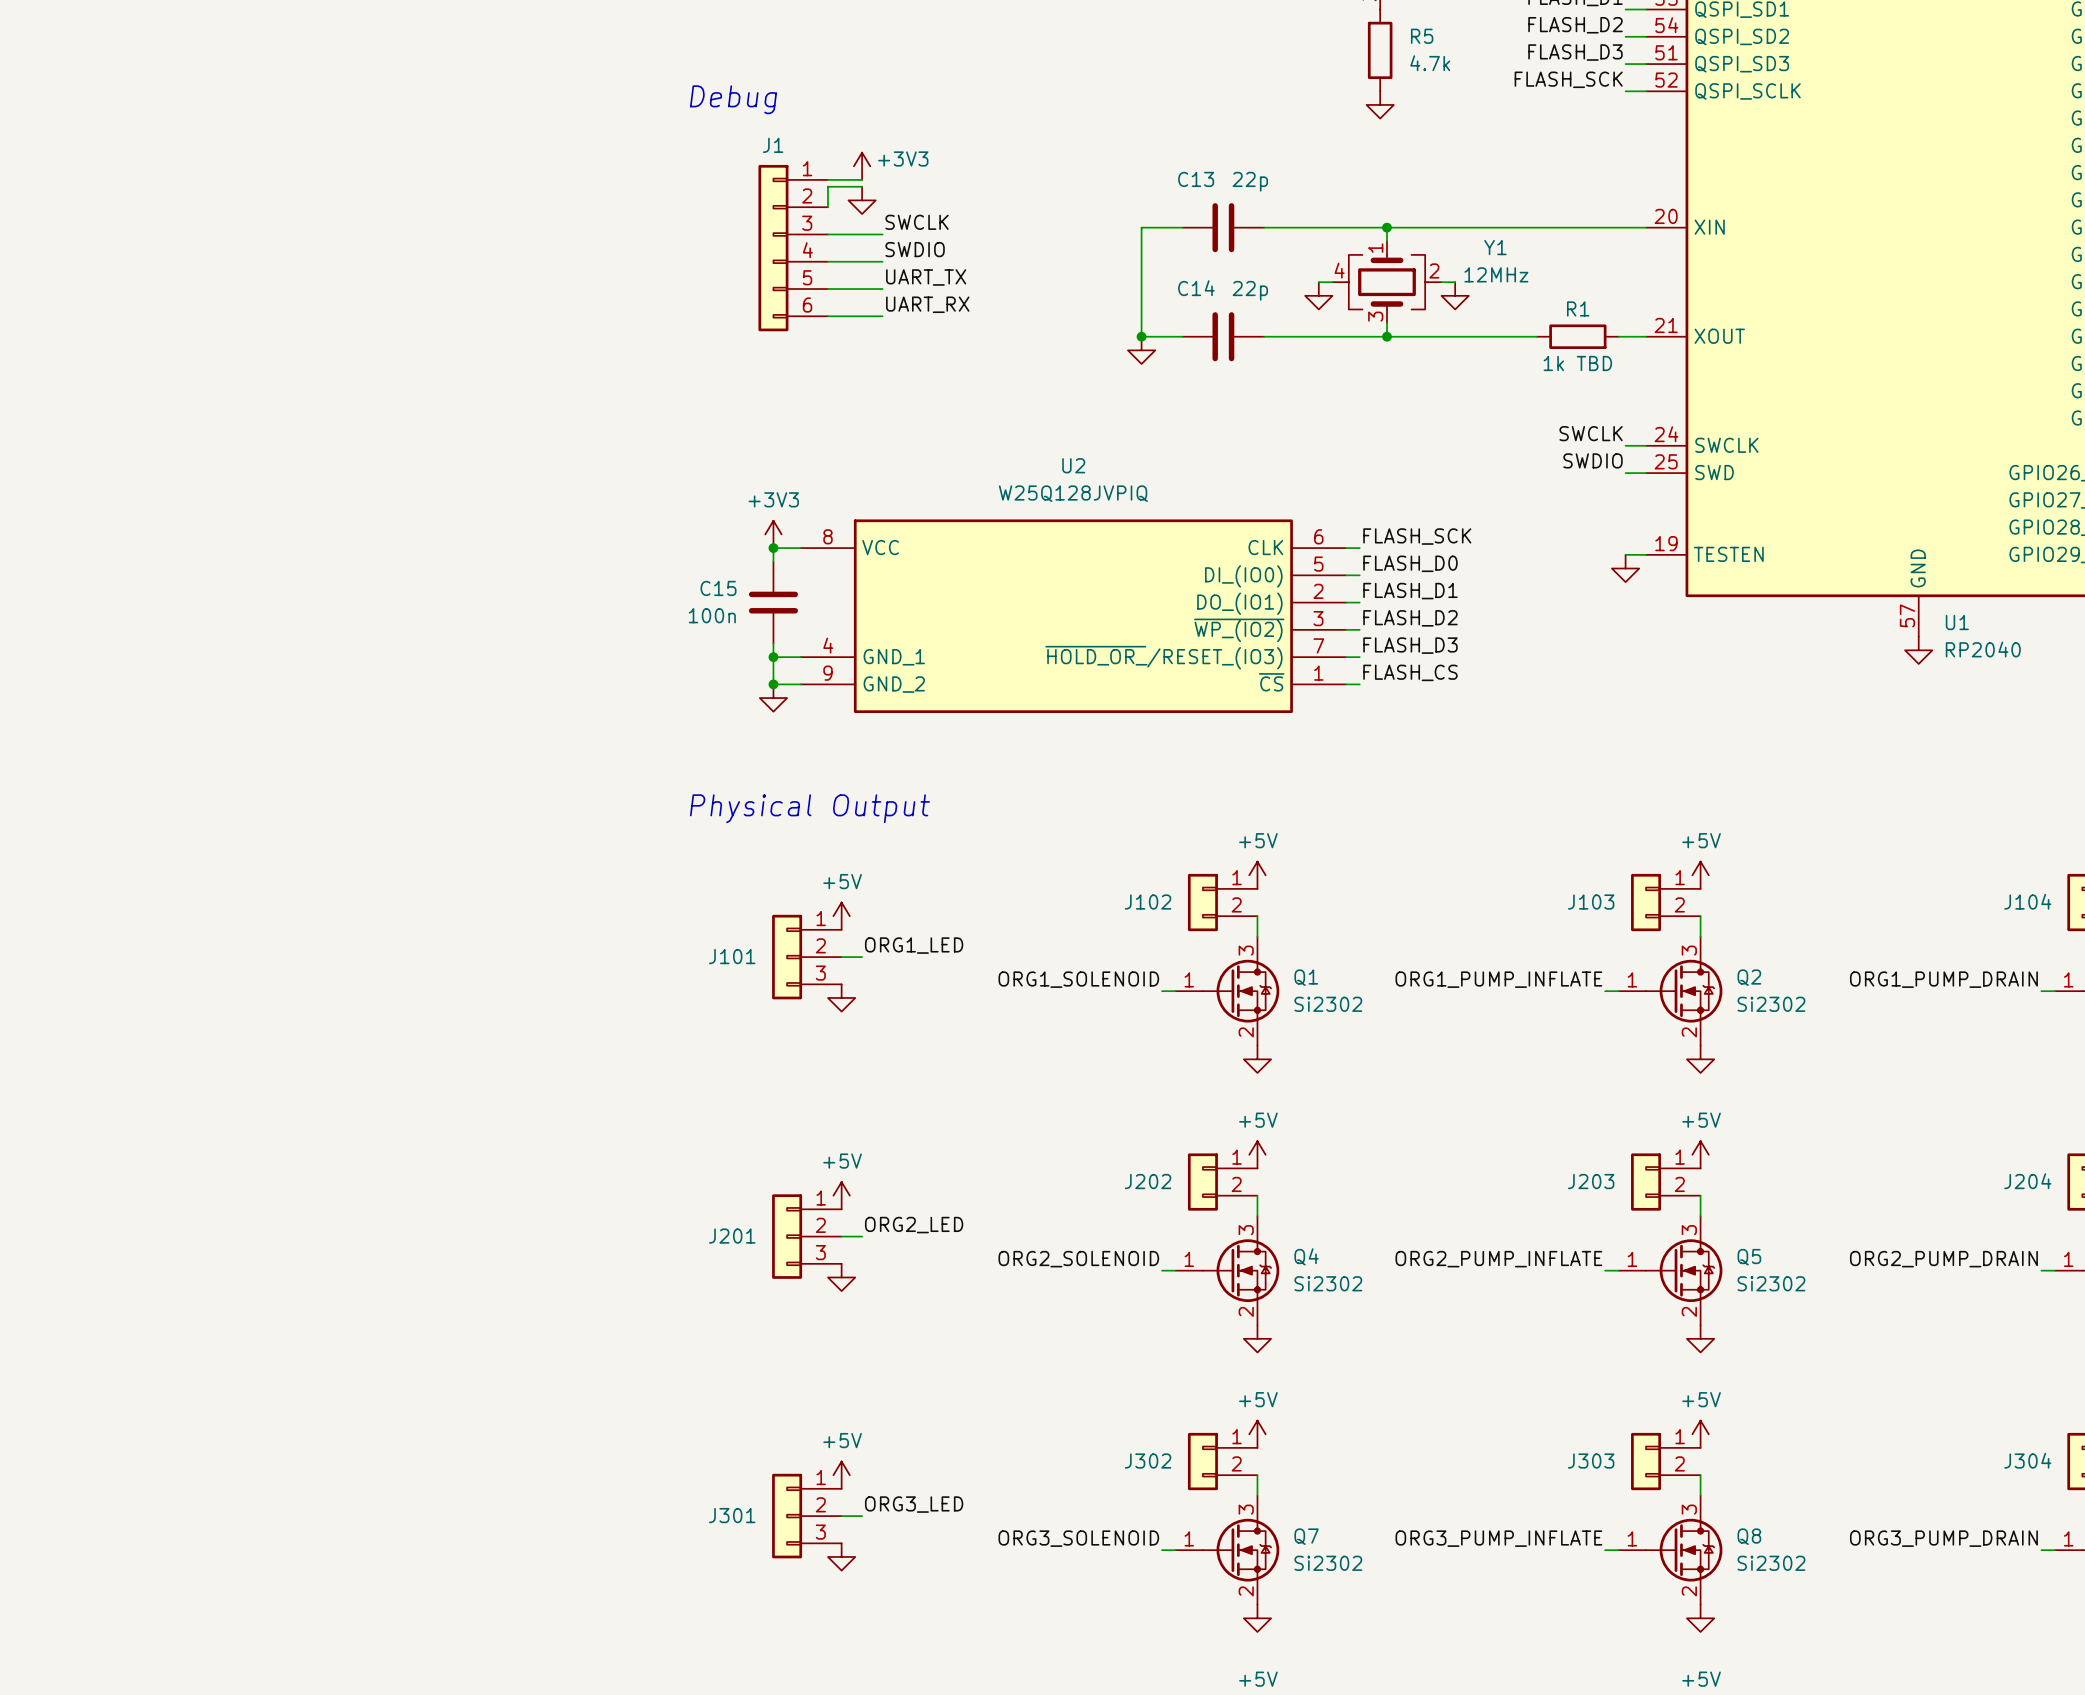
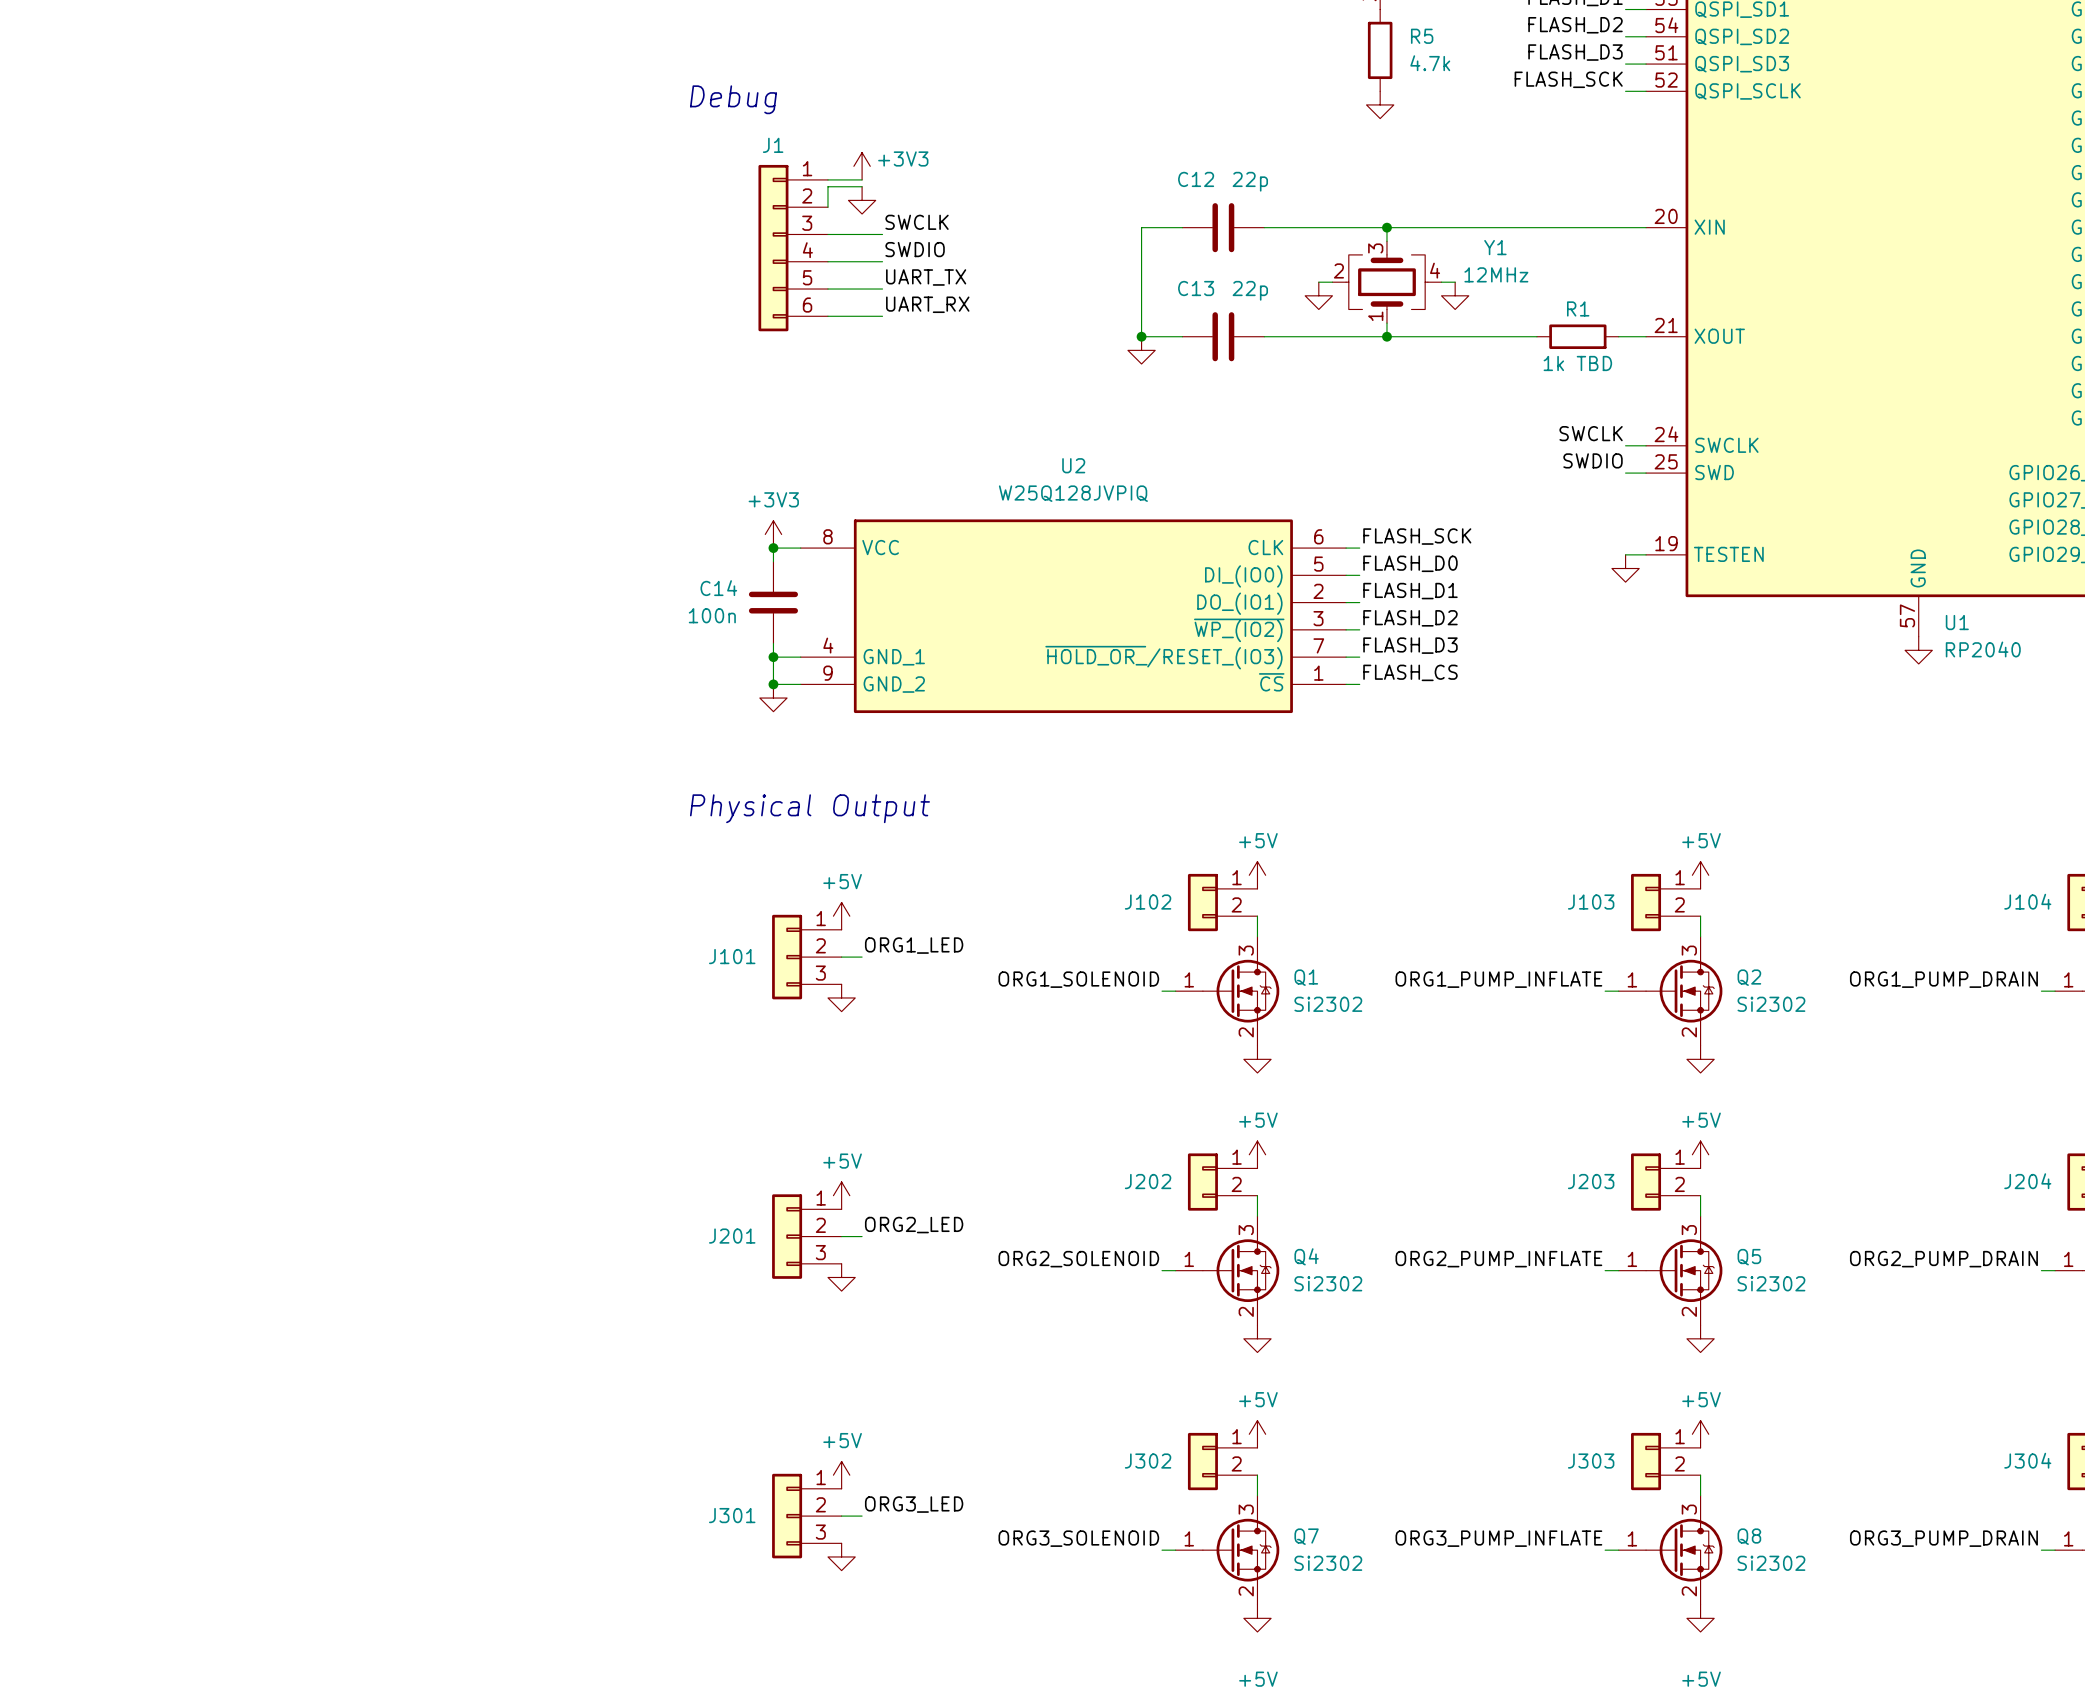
C13 name: C13 (1196, 179) -> C12 (1196, 179)
Y1 rotation: 0° (1386, 282) -> 180° (1386, 282)
C14 name: C14 (1196, 288) -> C13 (1196, 288)
C15 name: C15 (718, 588) -> C14 (718, 588)

